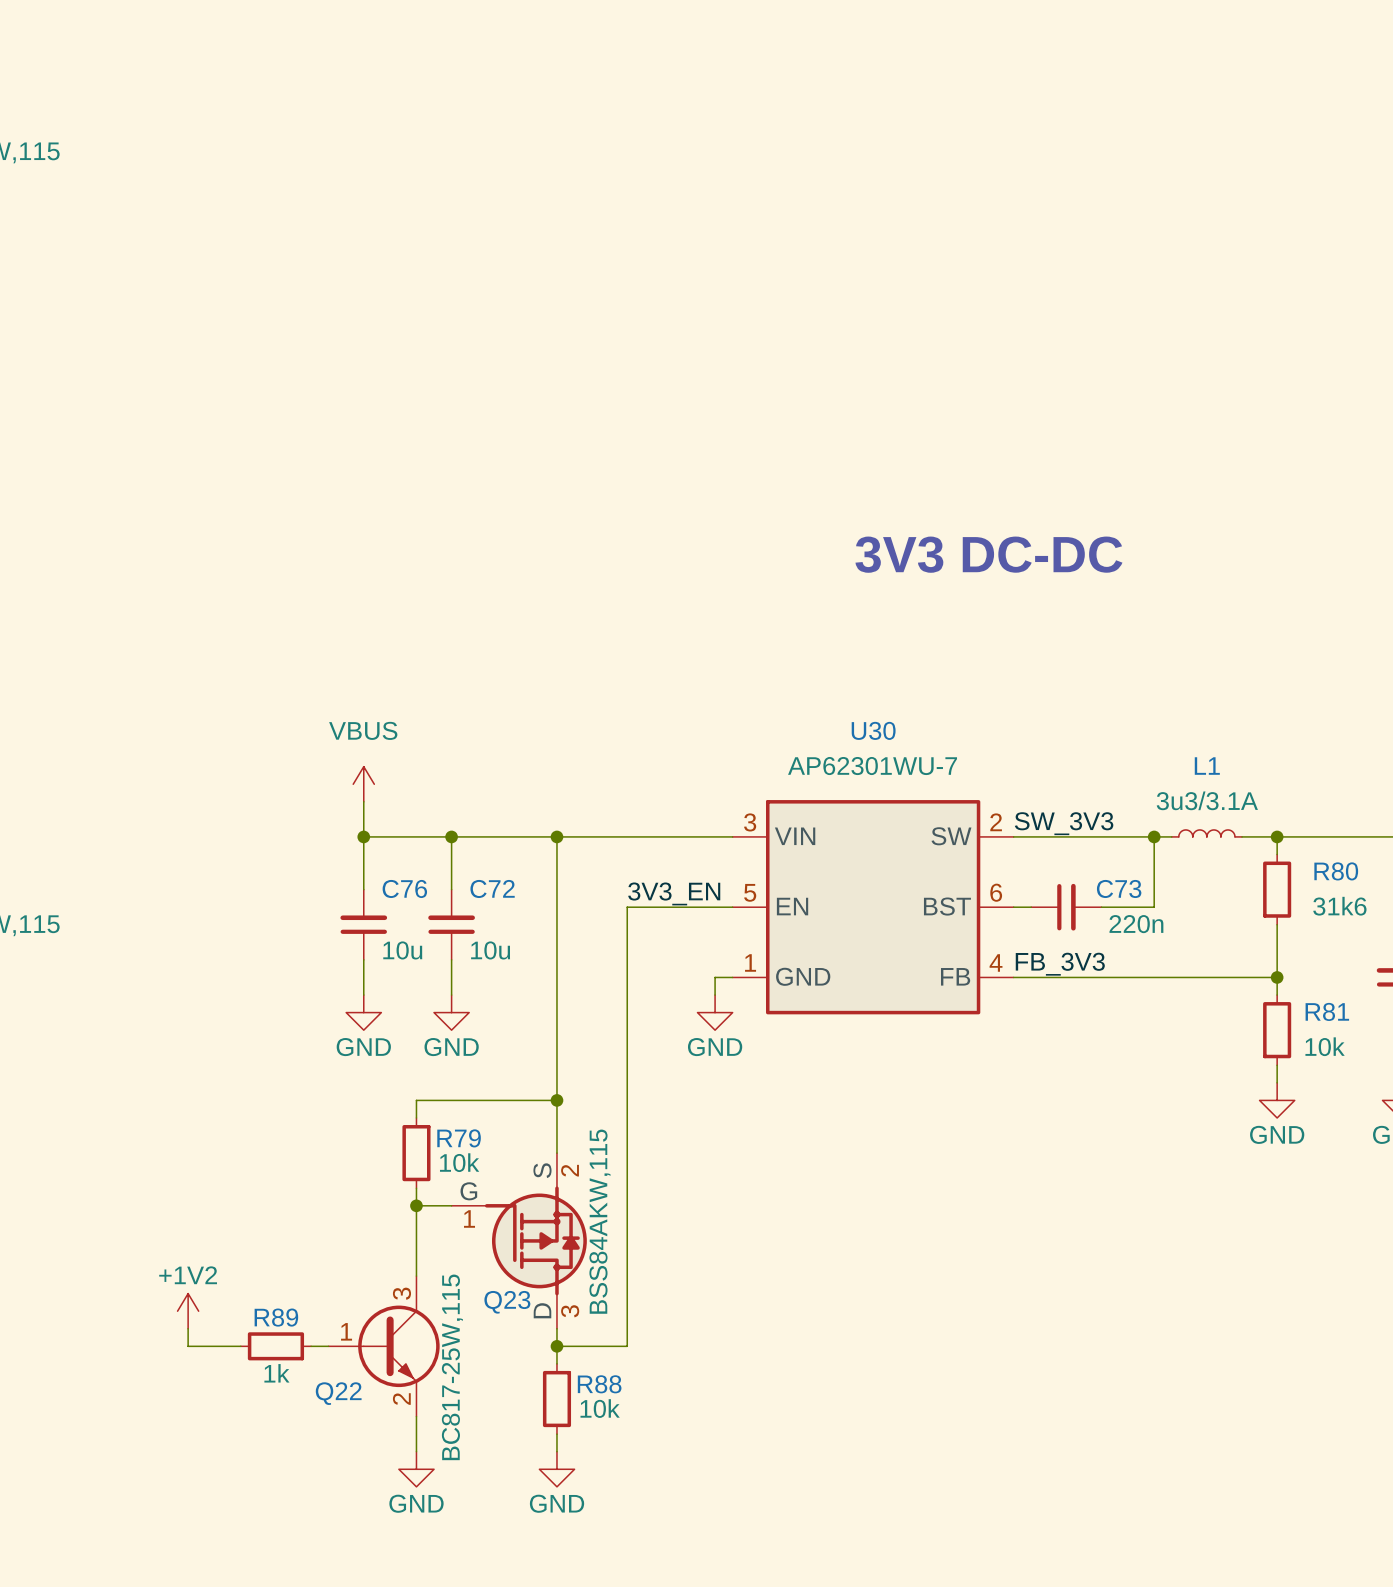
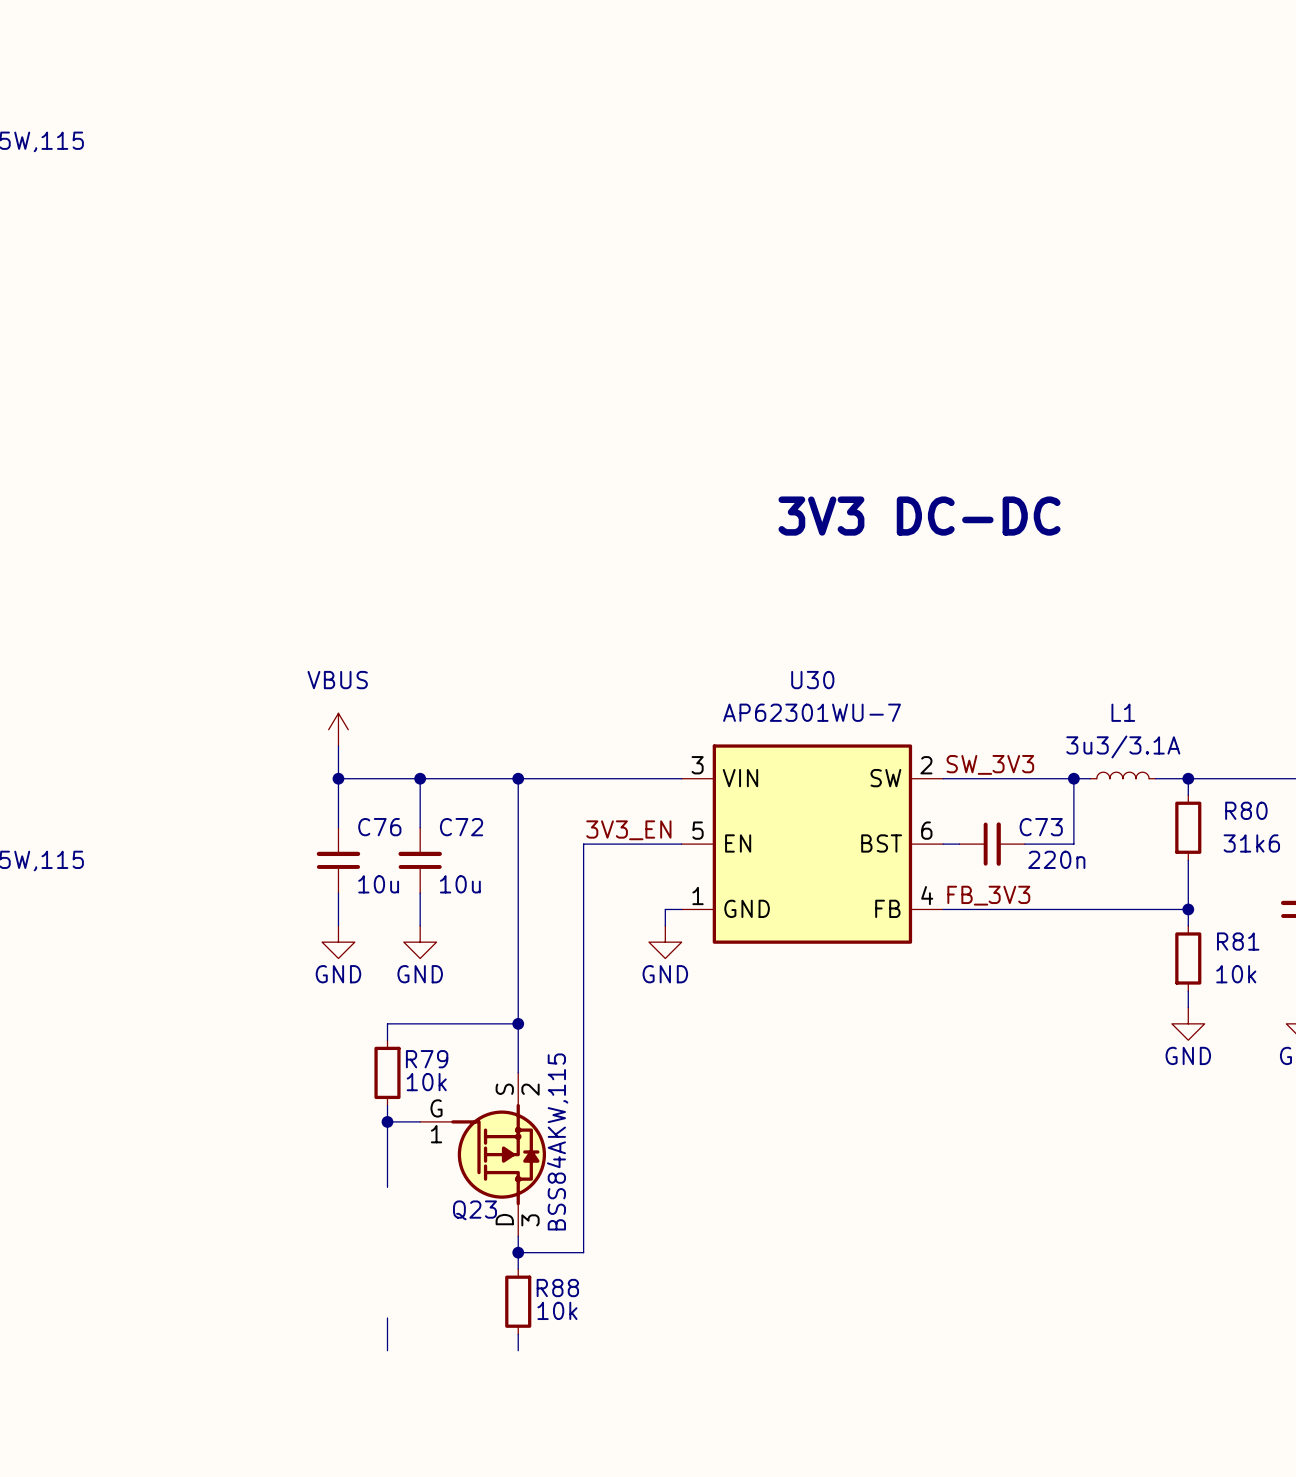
power symbol: +1V2 (188, 1311) -> none
wire: (188, 1328) (188, 1346) (240, 1346) -> none
R89: (275, 1346) -> none
wire: (311, 1346) (328, 1346) -> none
Q22: (384, 1346) -> none
power symbol: GND (416, 1469) -> none
power symbol: GND (556, 1469) -> none

